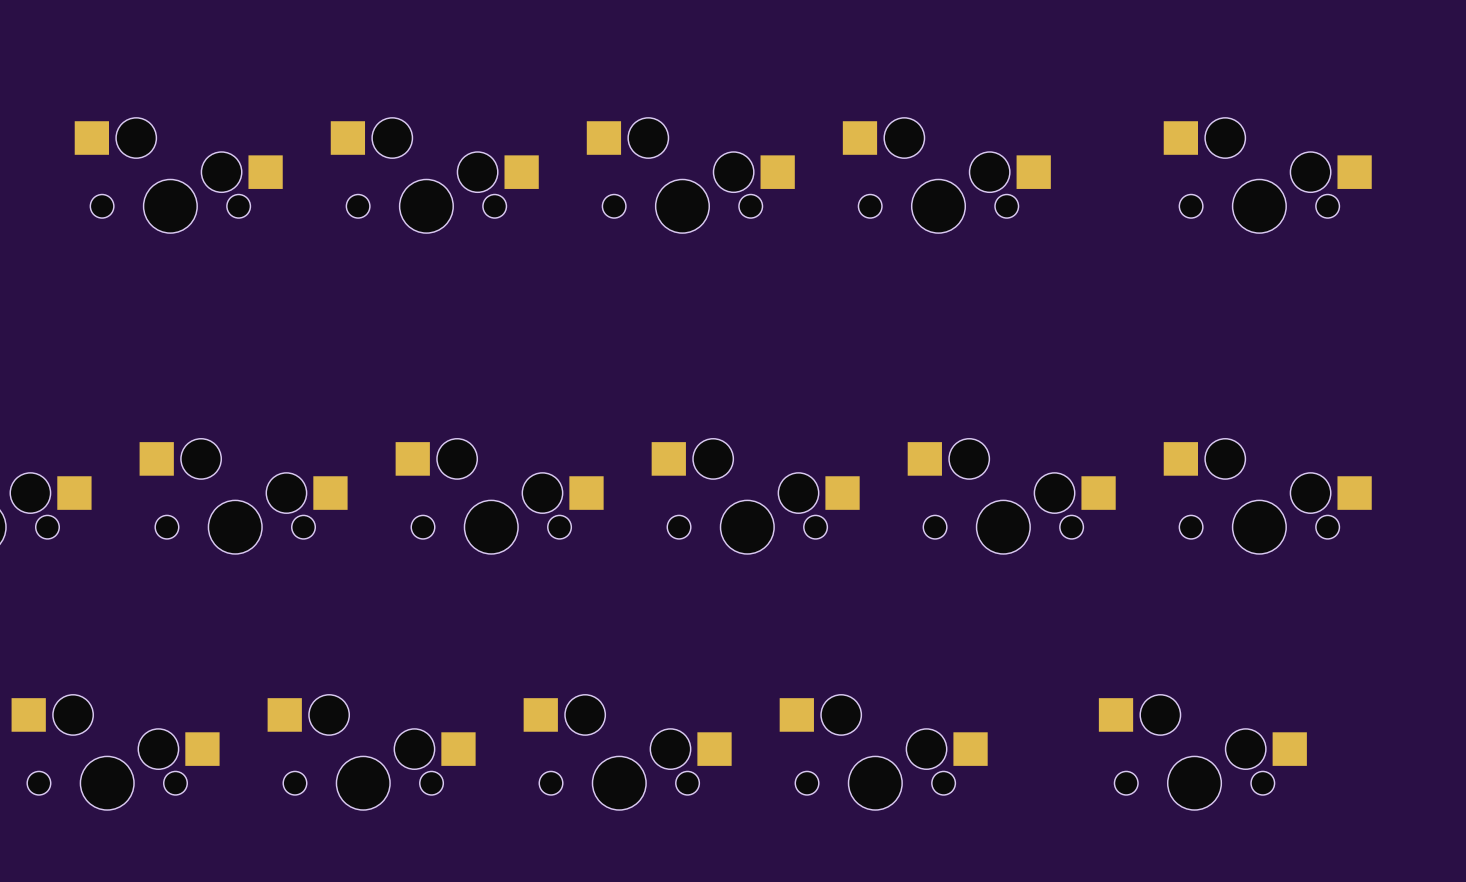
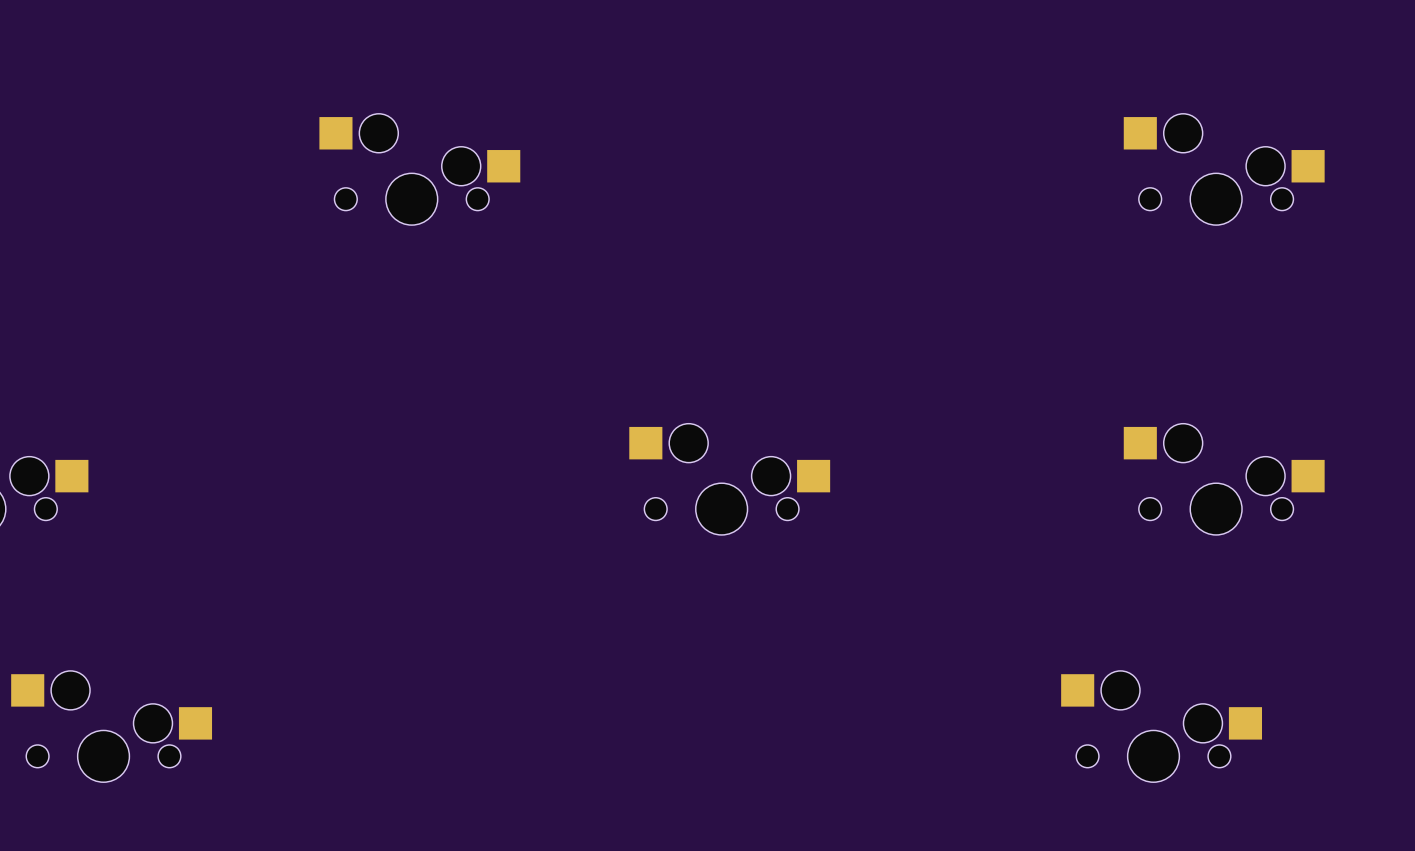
part: (178, 175) -> none
part: (690, 175) -> none
part: (946, 175) -> none
part: (243, 496) -> none
part: (499, 496) -> none
part: (1011, 496) -> none
part: (371, 752) -> none
part: (627, 752) -> none
part: (883, 752) -> none

